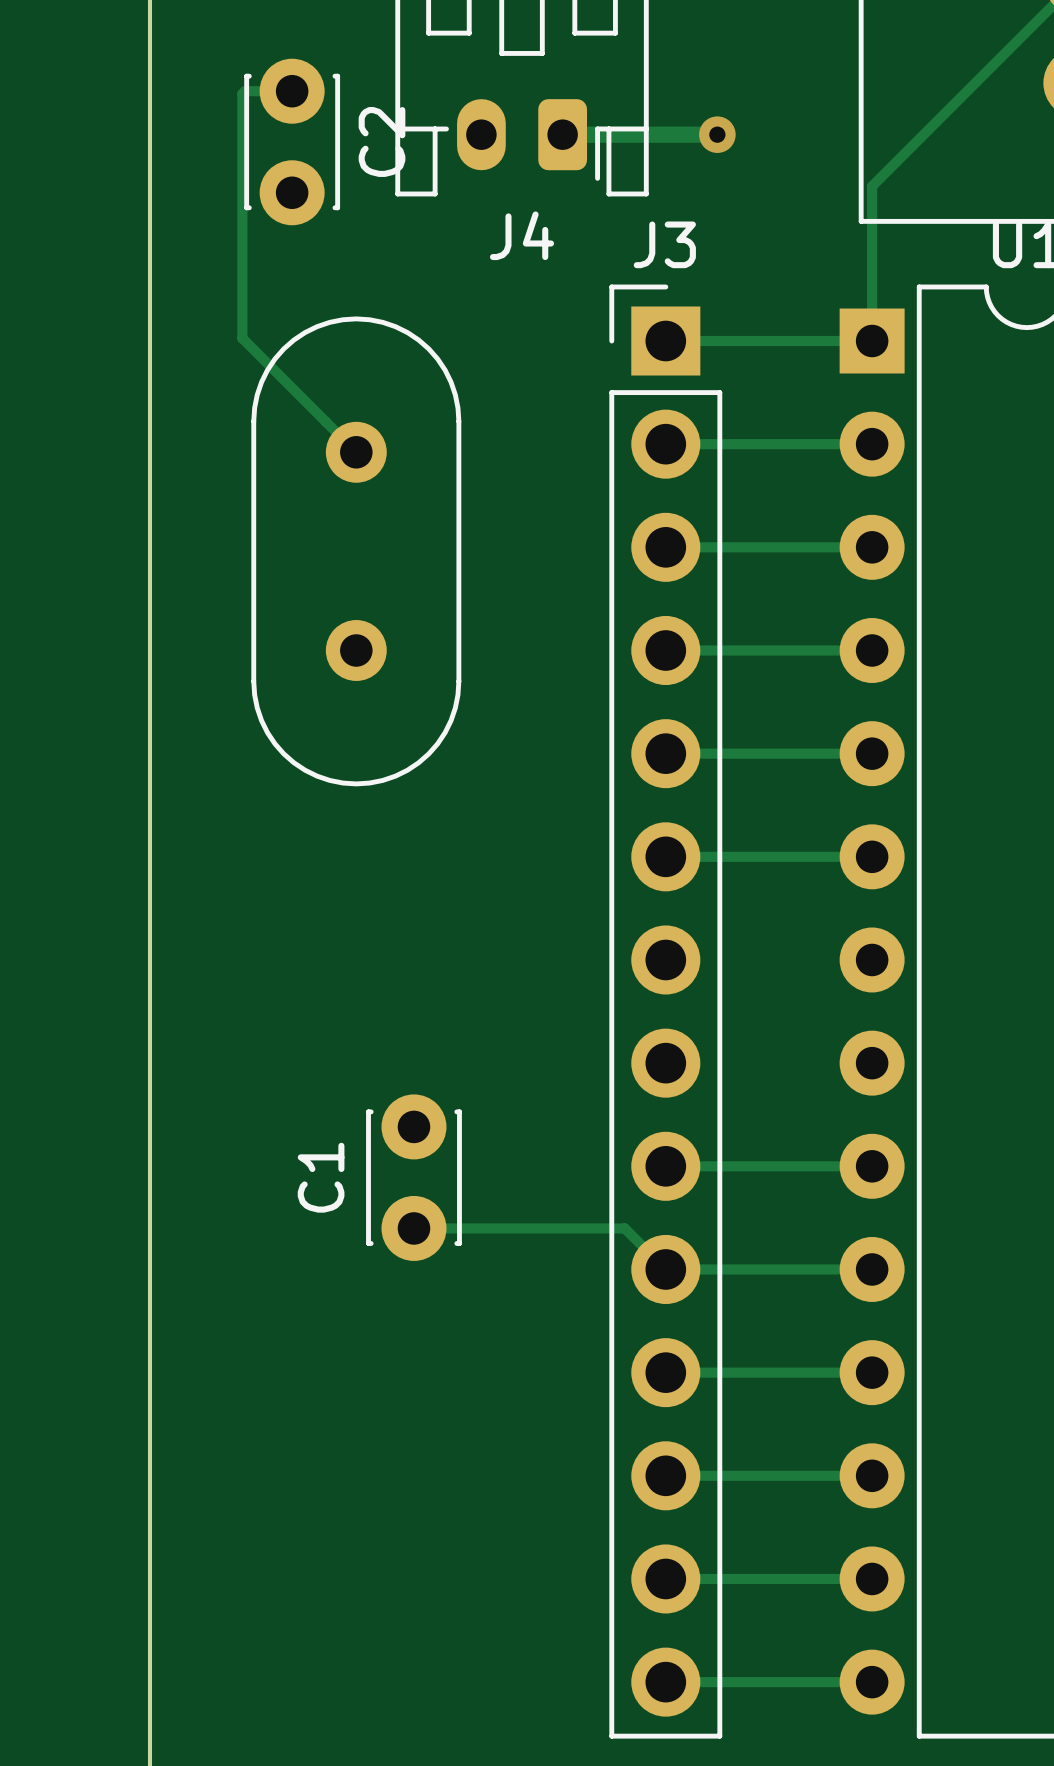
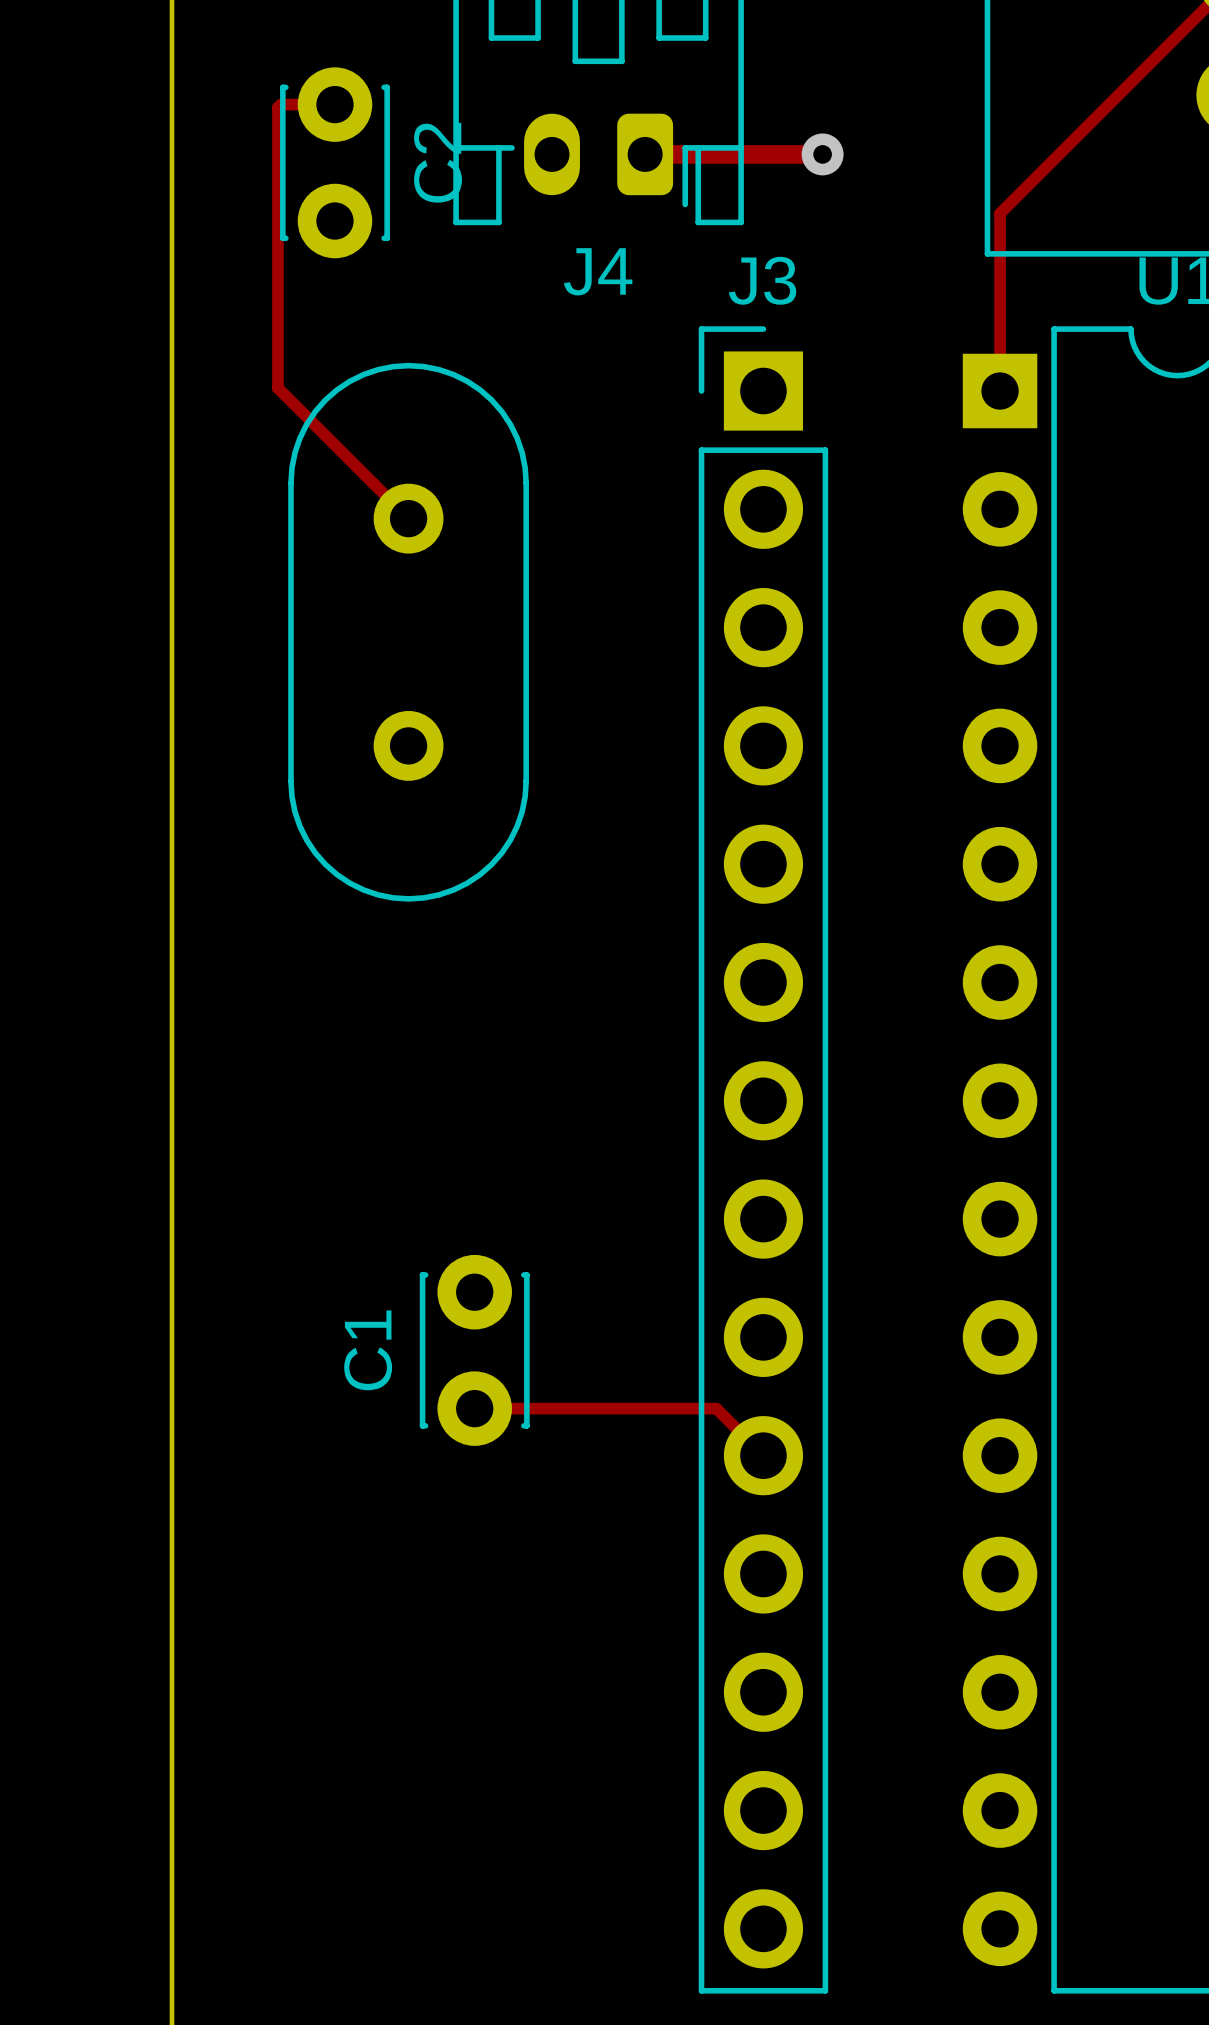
track: (665, 341) (872, 341) -> none
track: (665, 444) (872, 444) -> none
track: (665, 547) (872, 547) -> none
track: (665, 650) (872, 650) -> none
track: (665, 753) (872, 753) -> none
track: (665, 856) (872, 856) -> none
track: (665, 1166) (872, 1166) -> none
track: (665, 1269) (872, 1269) -> none
track: (665, 1372) (872, 1372) -> none
track: (665, 1475) (872, 1475) -> none
track: (665, 1578) (872, 1578) -> none
track: (665, 1682) (872, 1682) -> none

